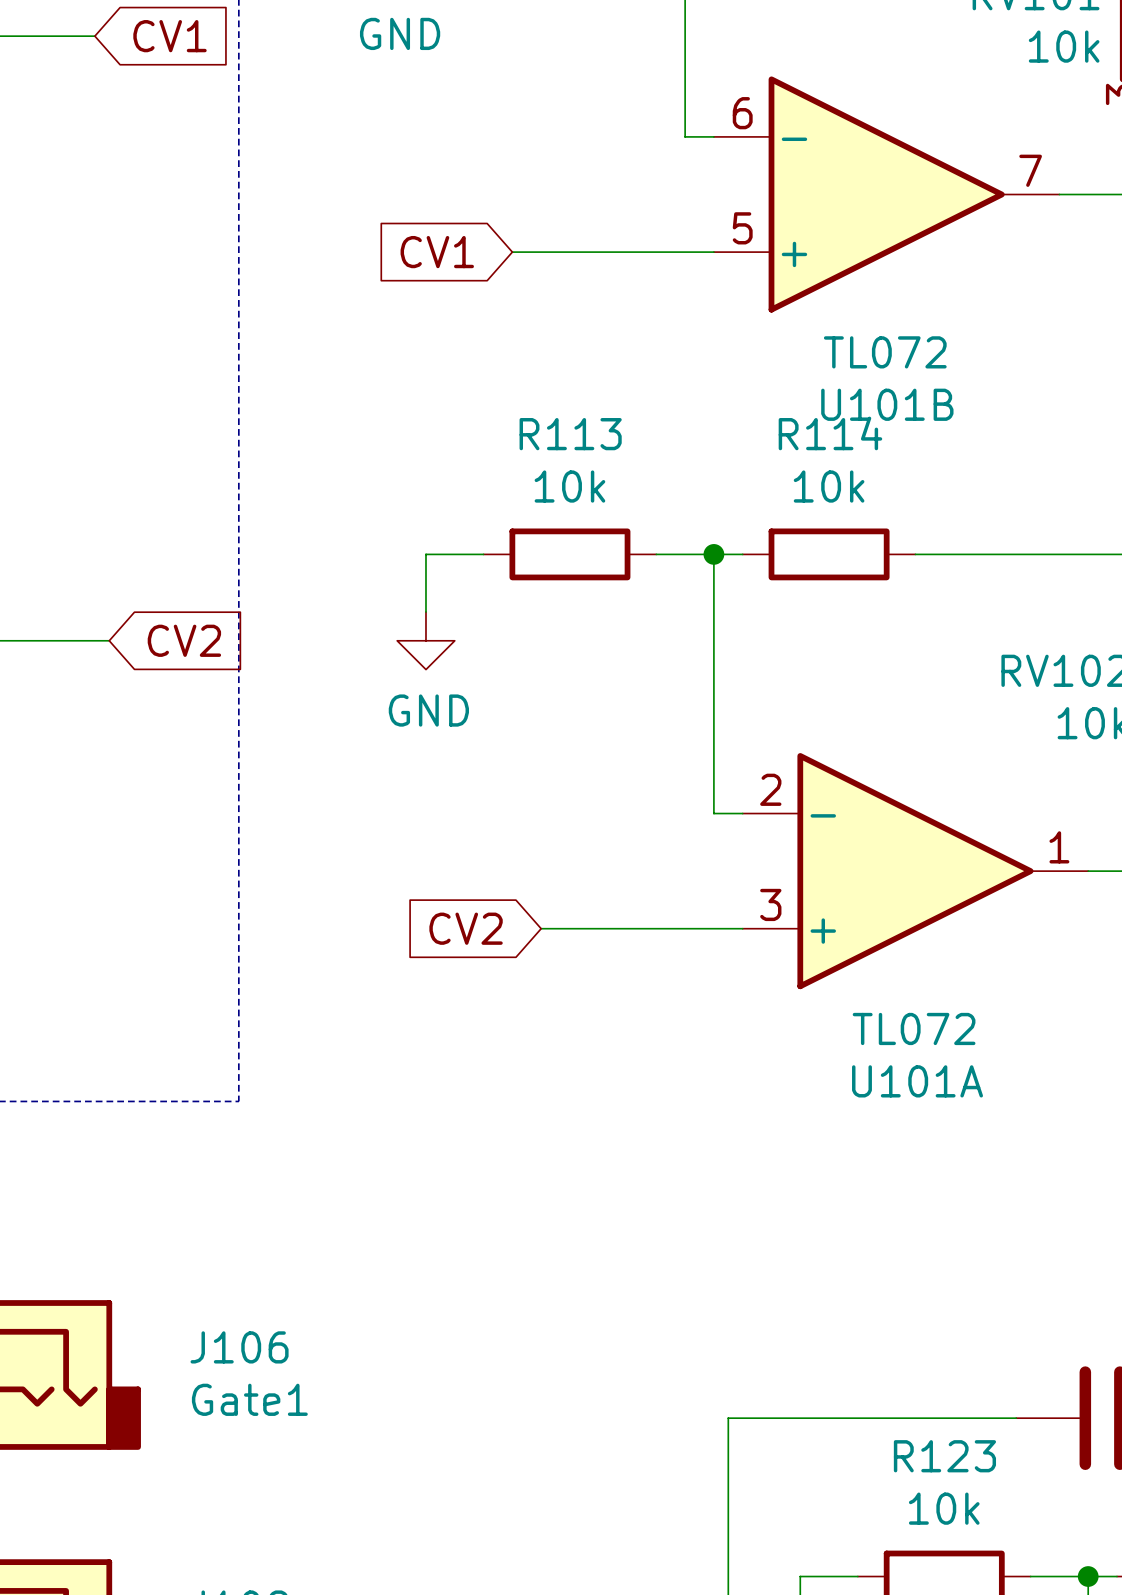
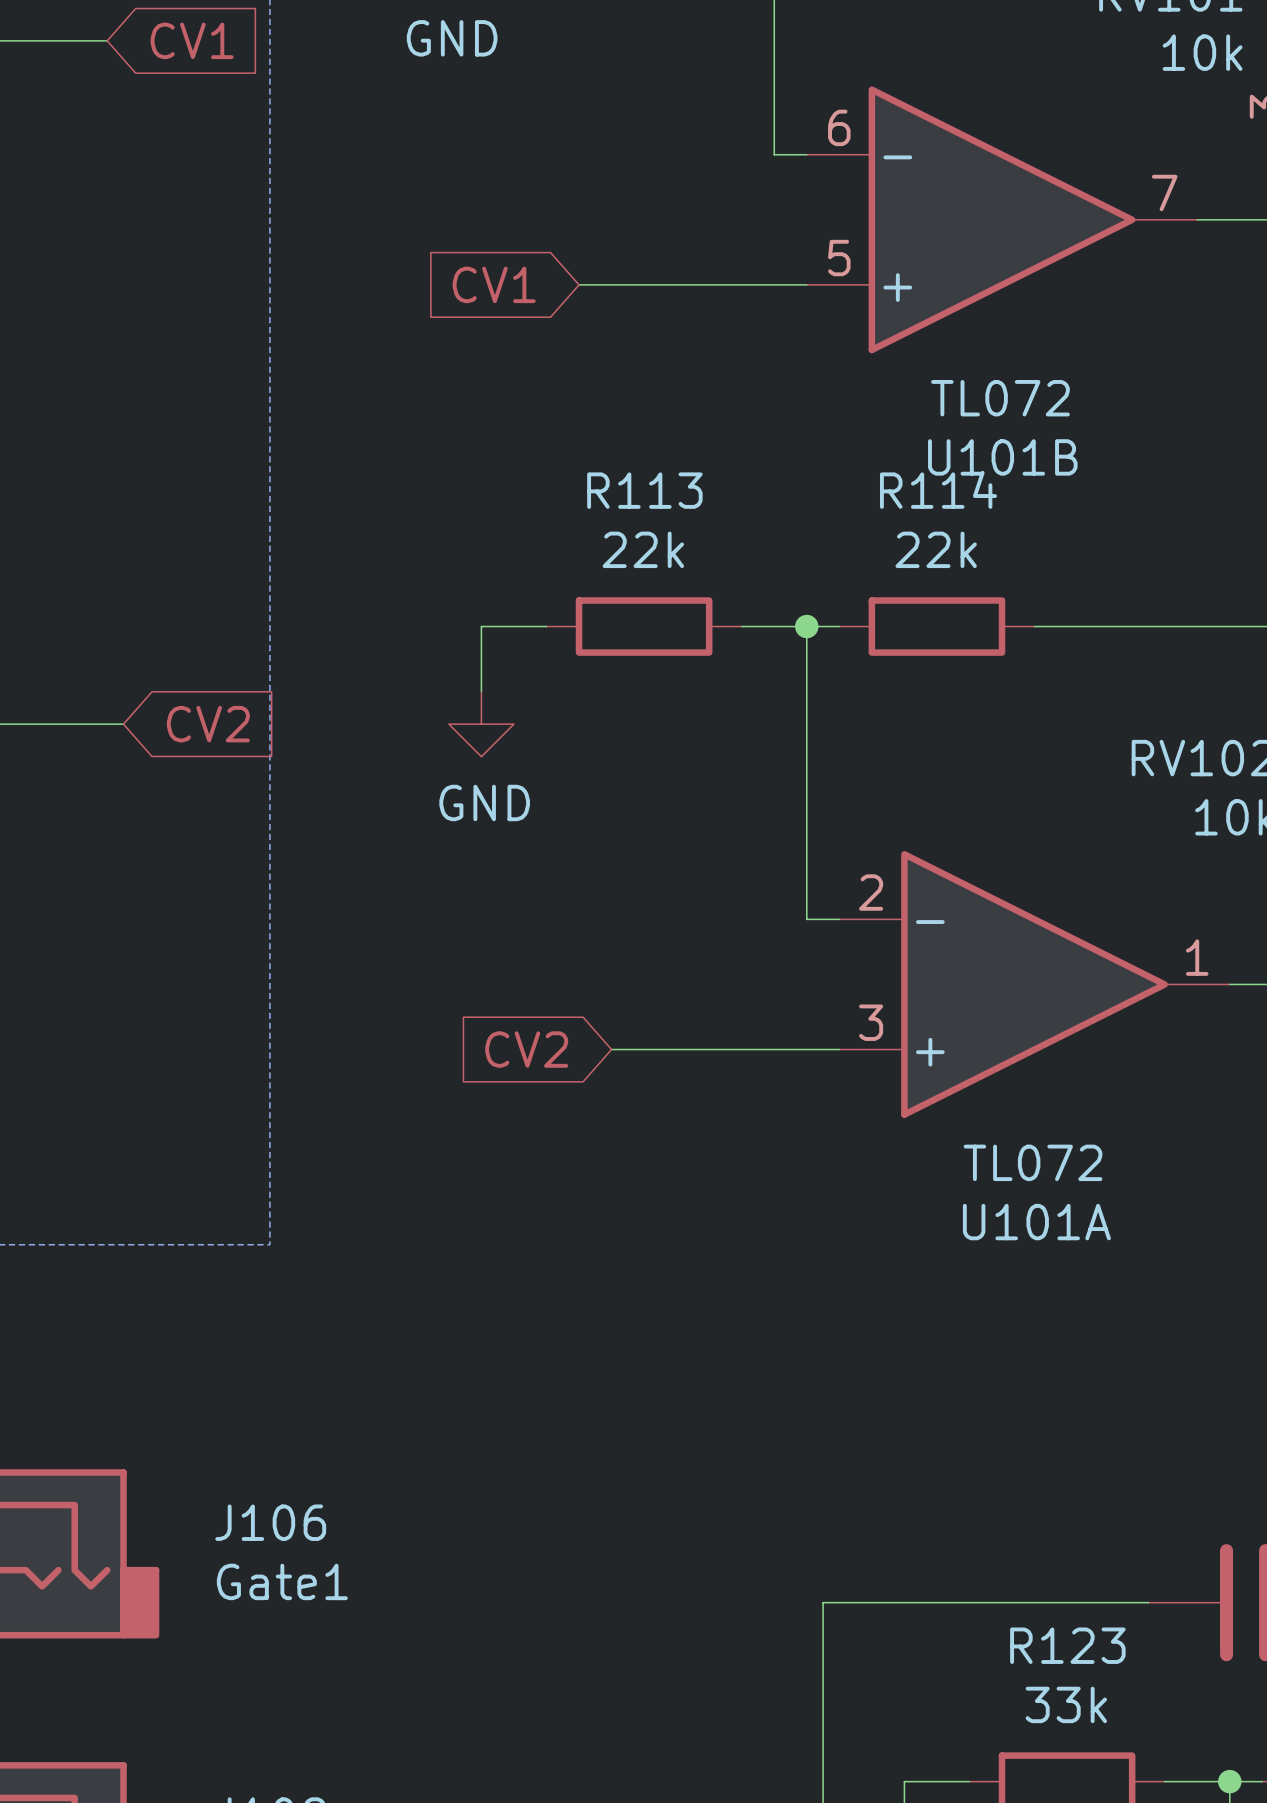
R113 value: 10k (569, 486) -> 22k (643, 549)
R114 value: 10k (829, 486) -> 22k (936, 549)
R123 value: 10k (944, 1508) -> 33k (1066, 1704)

